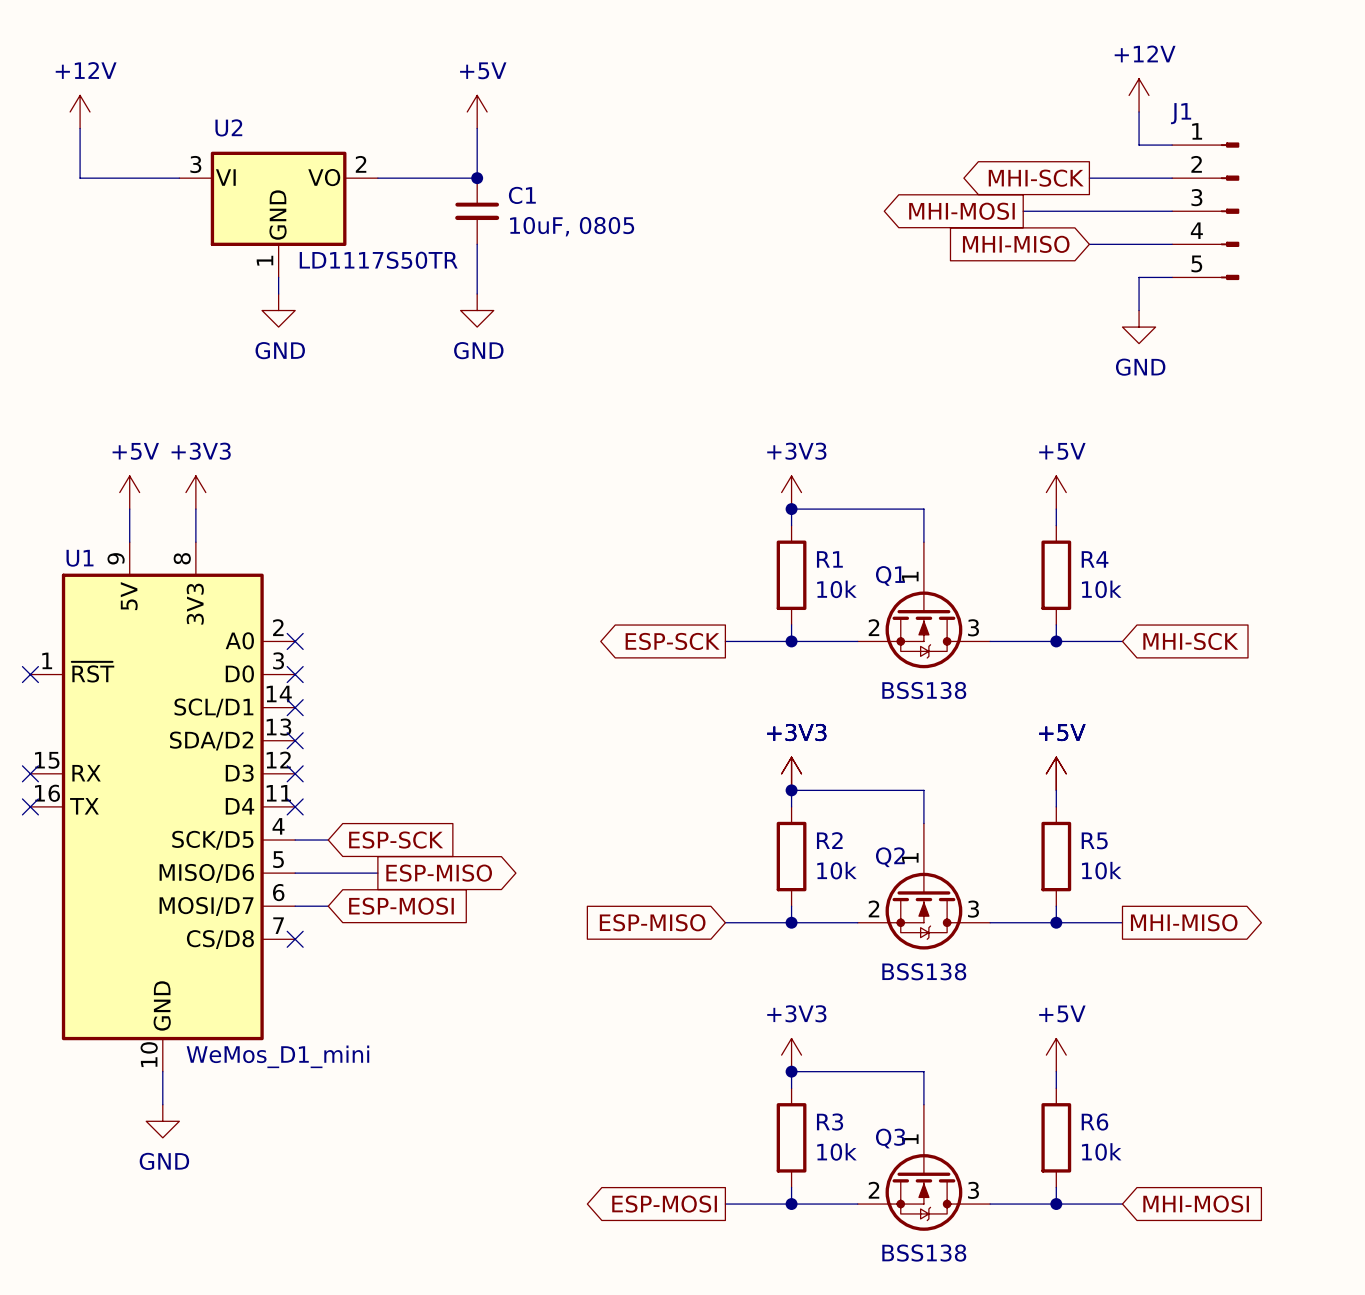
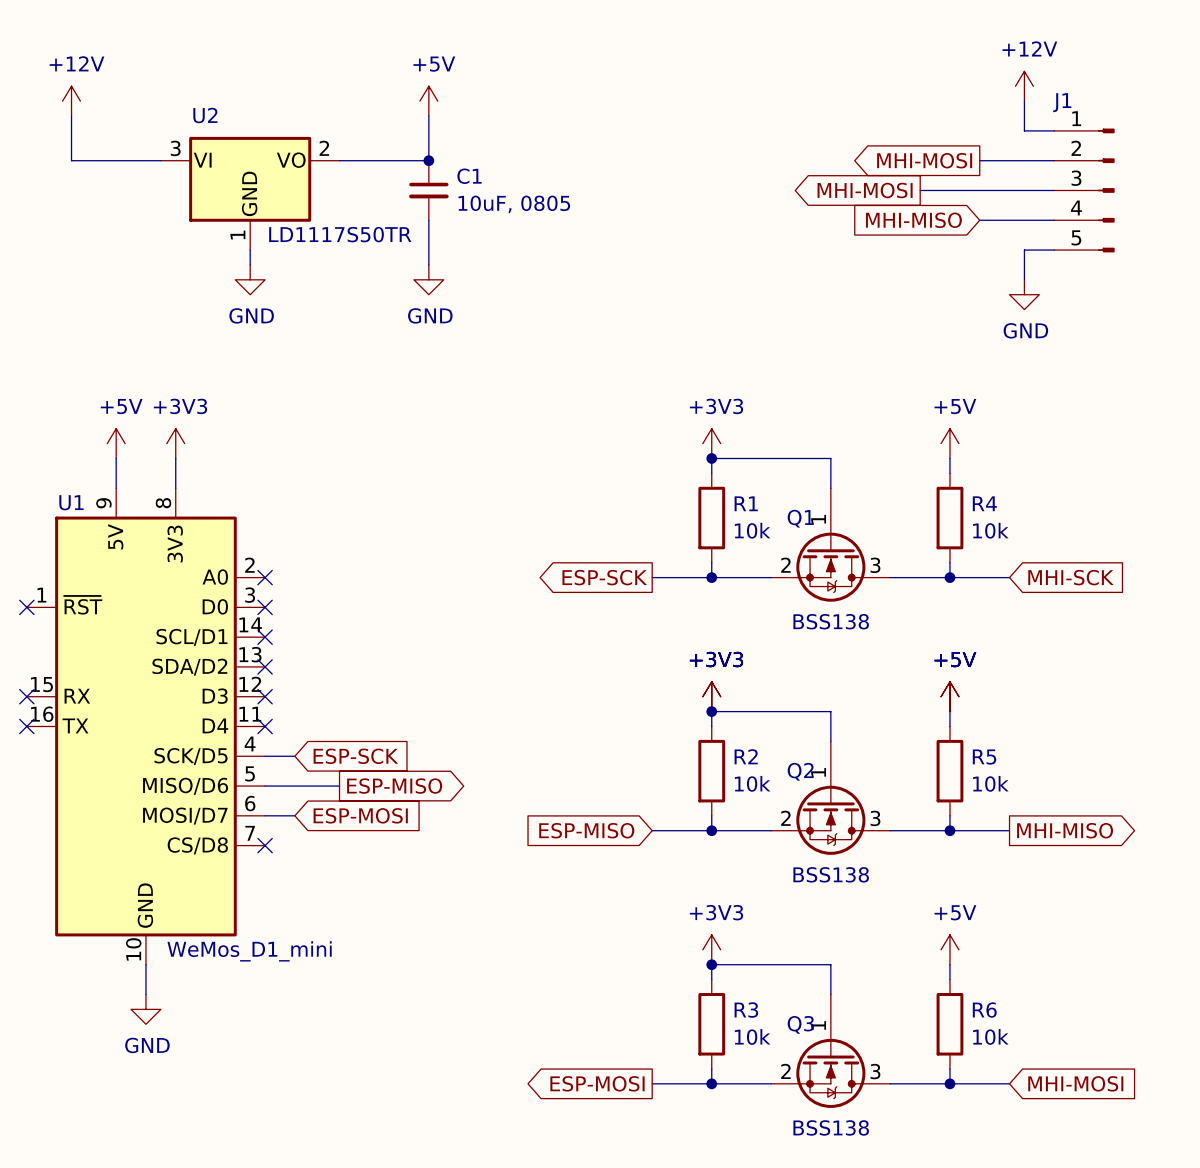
global label: MHI-SCK (1036, 178) -> MHI-MOSI (924, 160)

